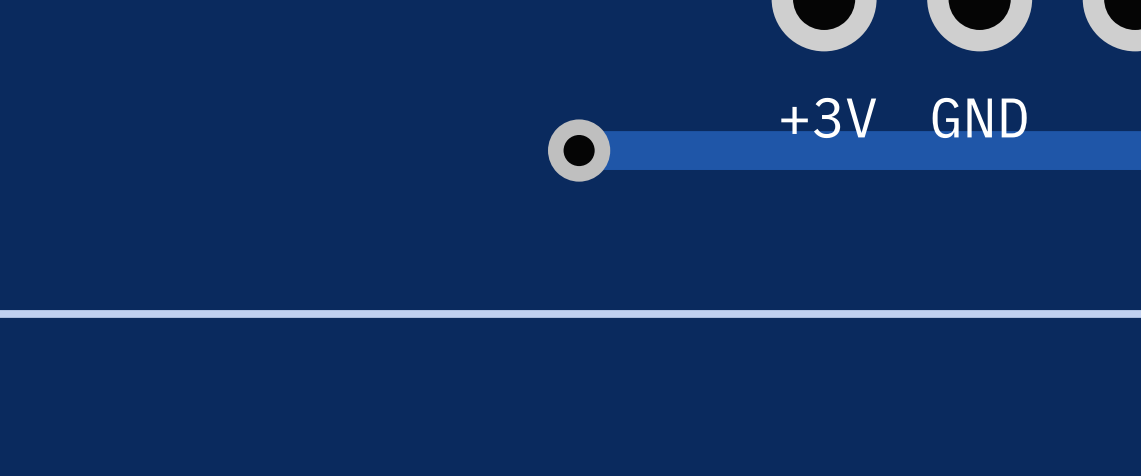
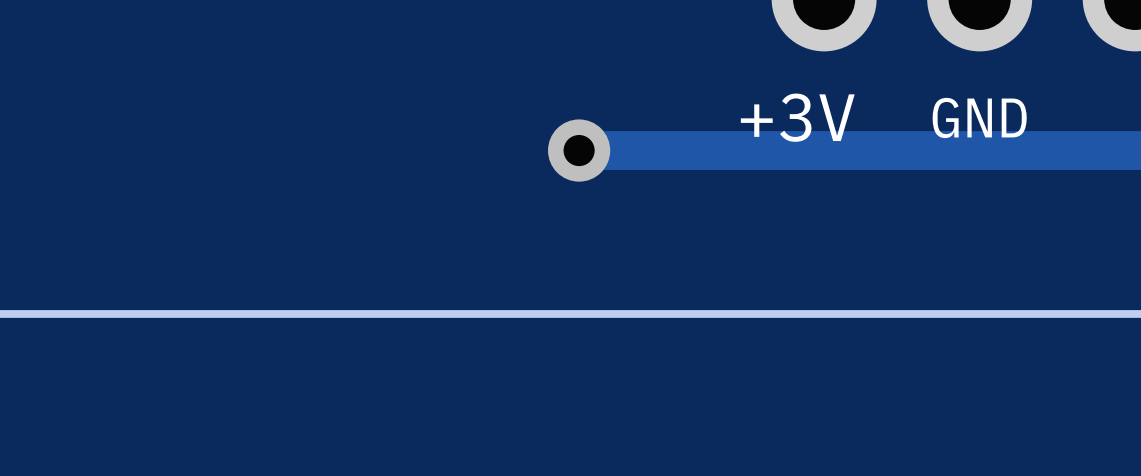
text position: +3V (828, 117) -> +3V (797, 117)

